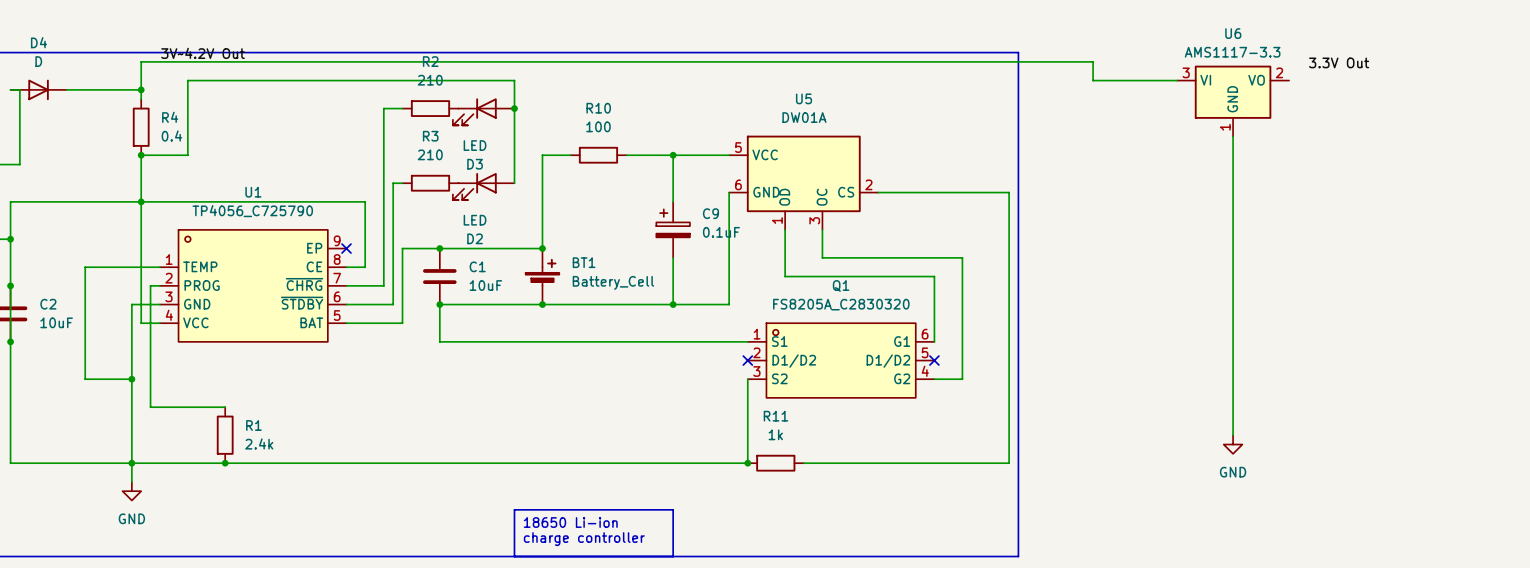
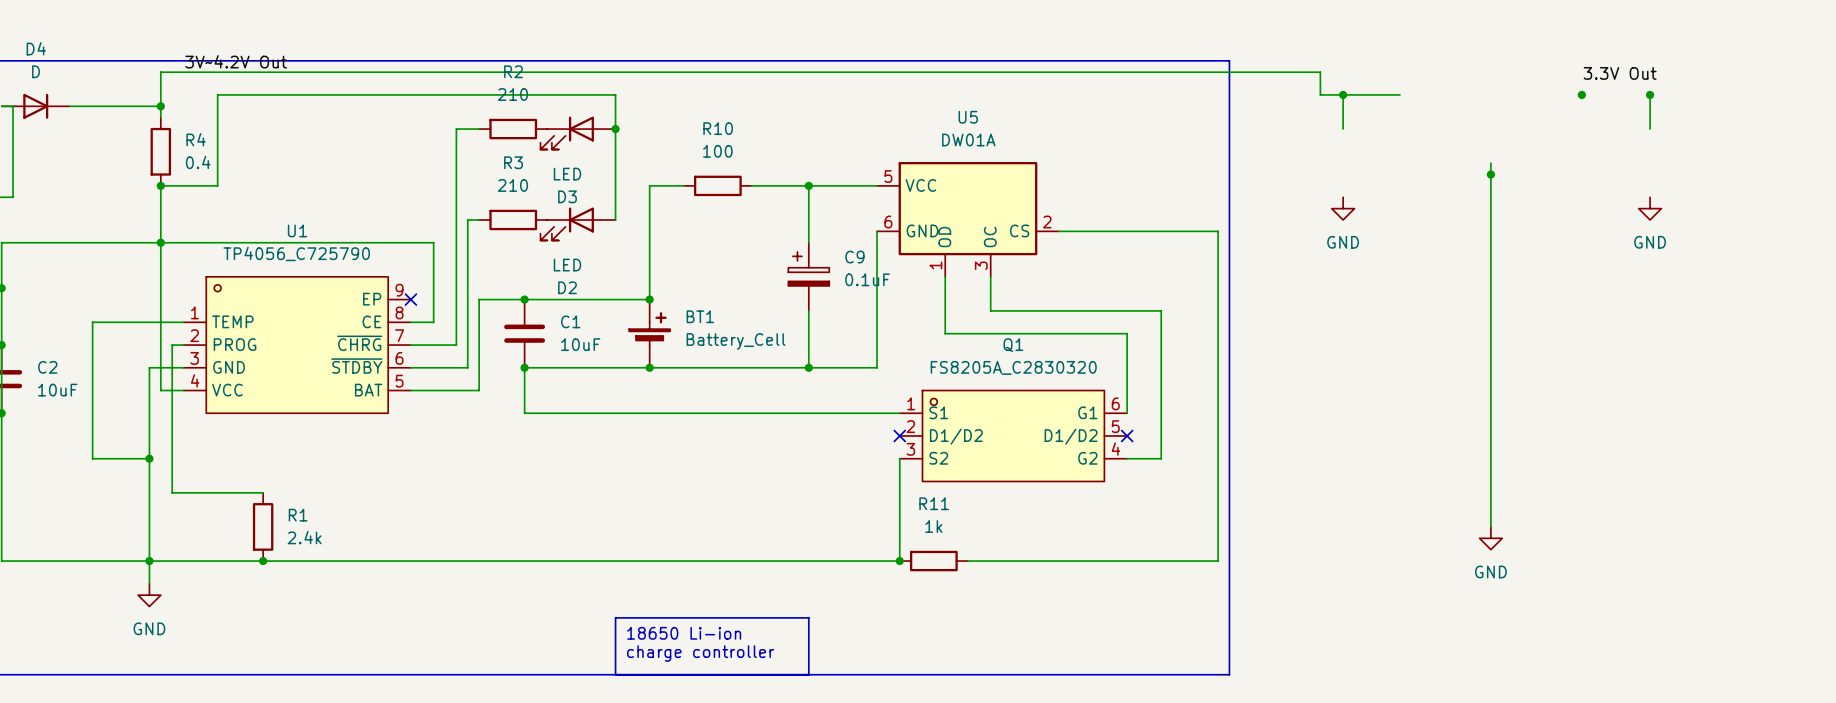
wire: none -> (1343, 94) (1343, 129)
junction: none -> (1343, 94)
wire: (1158, 80) (1177, 80) -> none
junction: none -> (1581, 94)
wire: none -> (1650, 94) (1650, 129)
junction: none -> (1650, 94)
U6: AMS1117-3.3 (1233, 101) -> none
junction: none -> (1490, 174)
power symbol: none -> GND (1343, 208)
power symbol: none -> GND (1650, 208)

